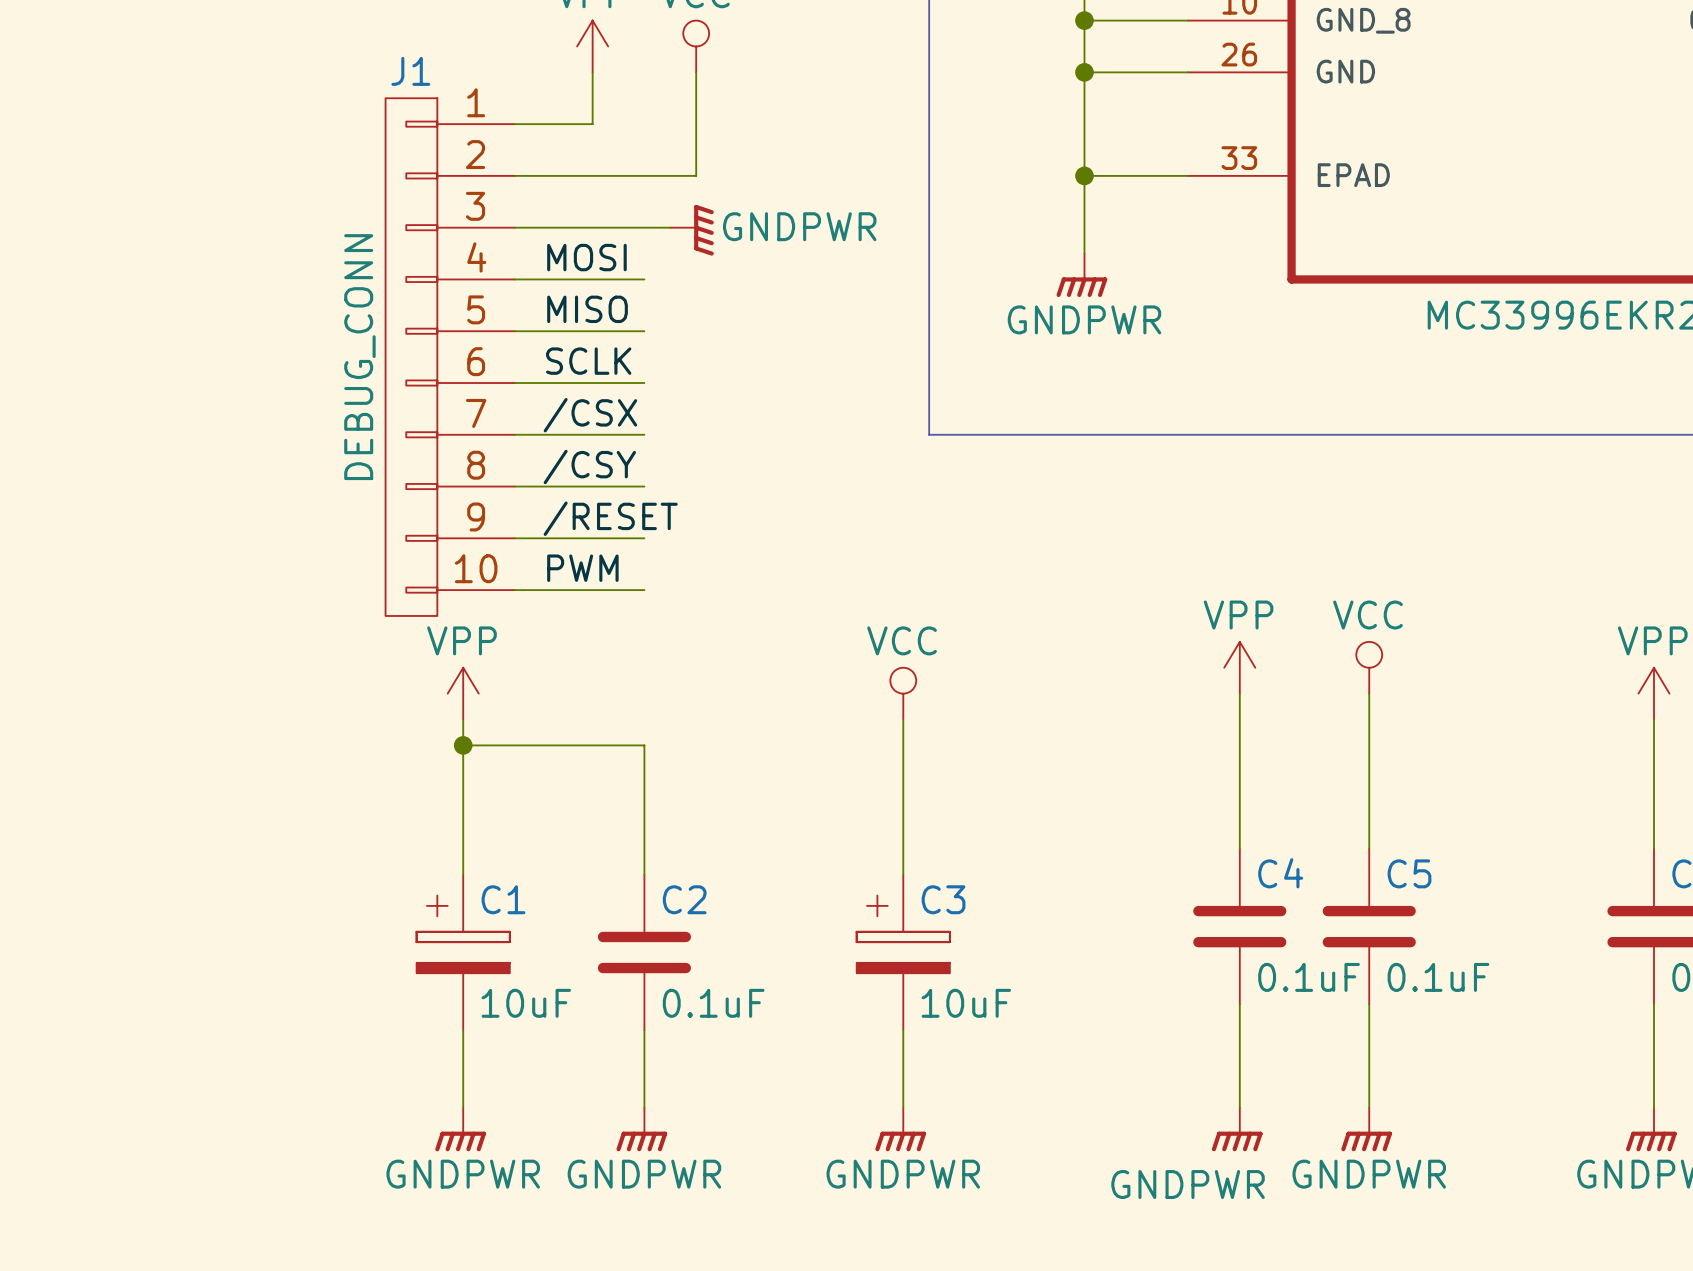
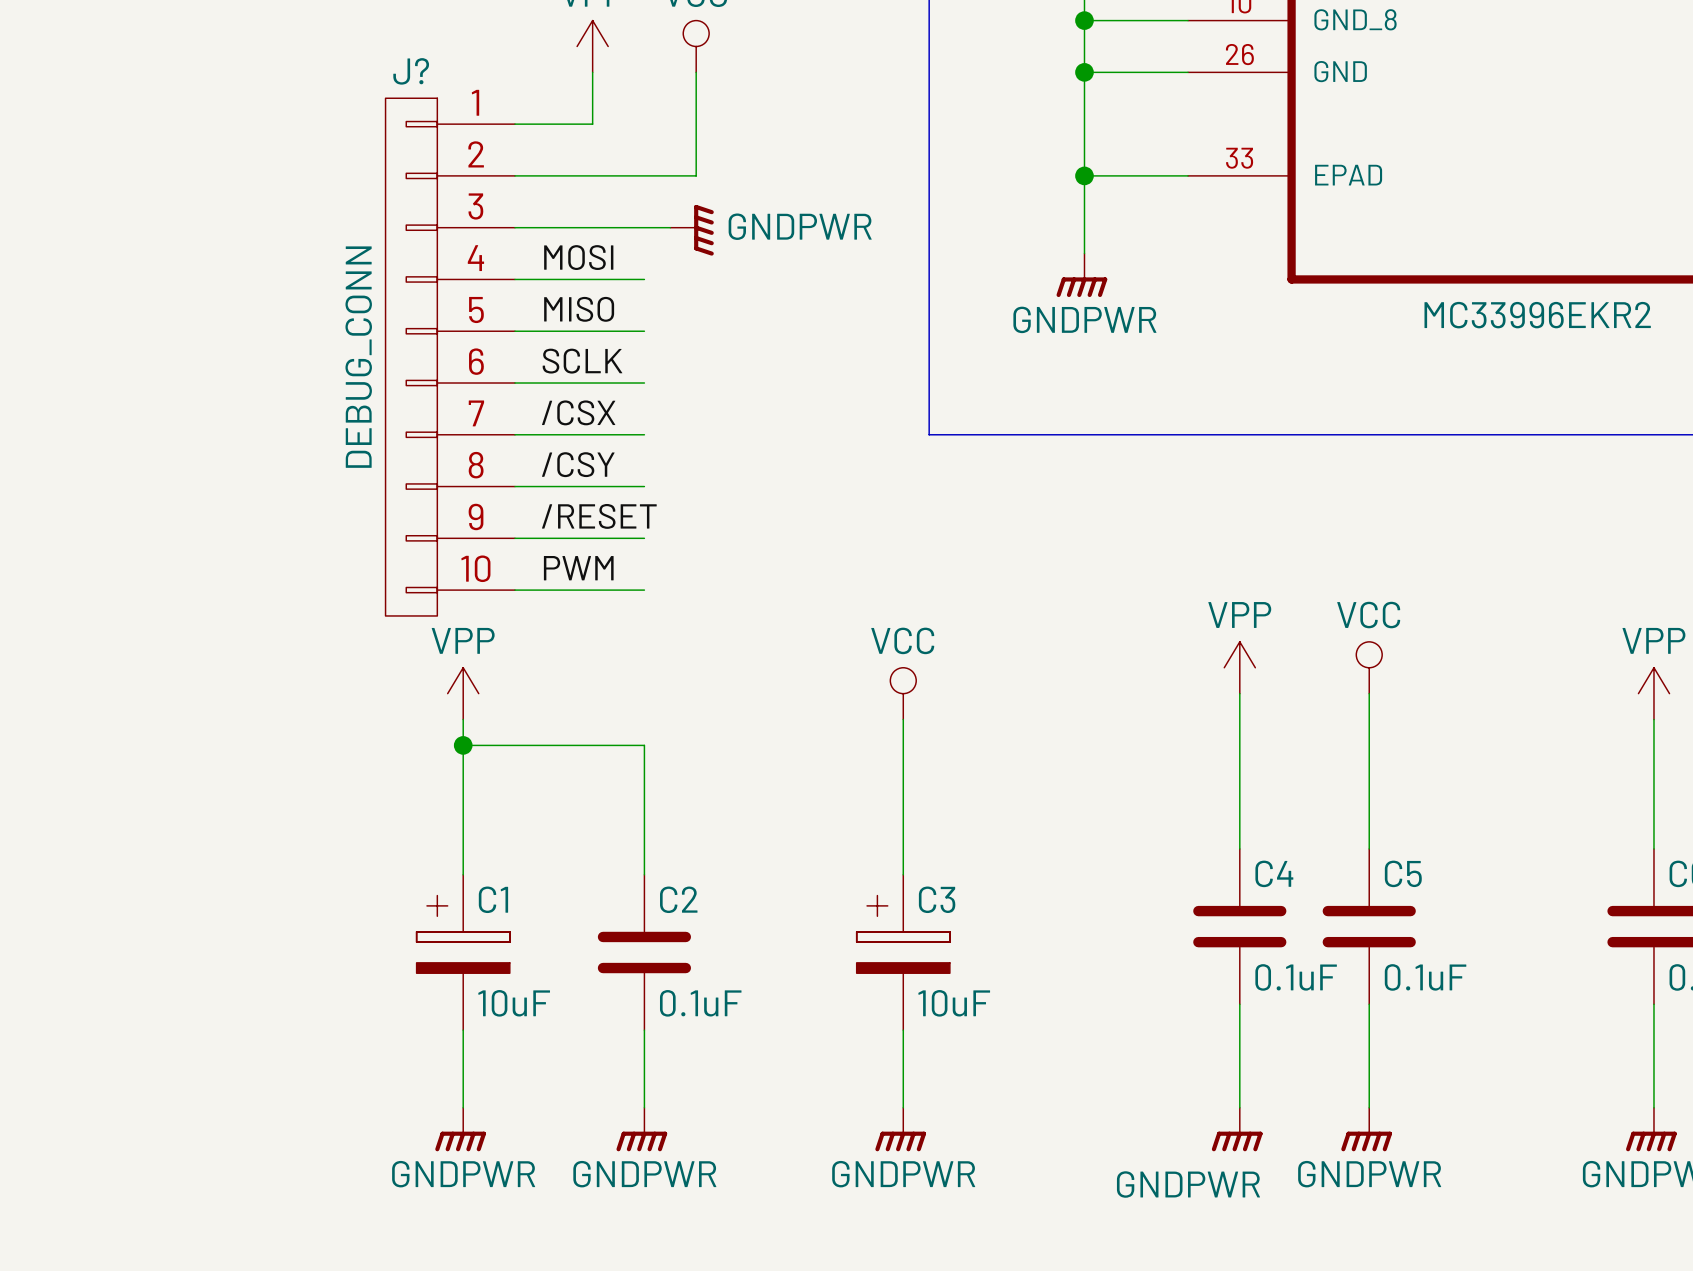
J1 name: J1 (410, 71) -> J? (411, 71)

